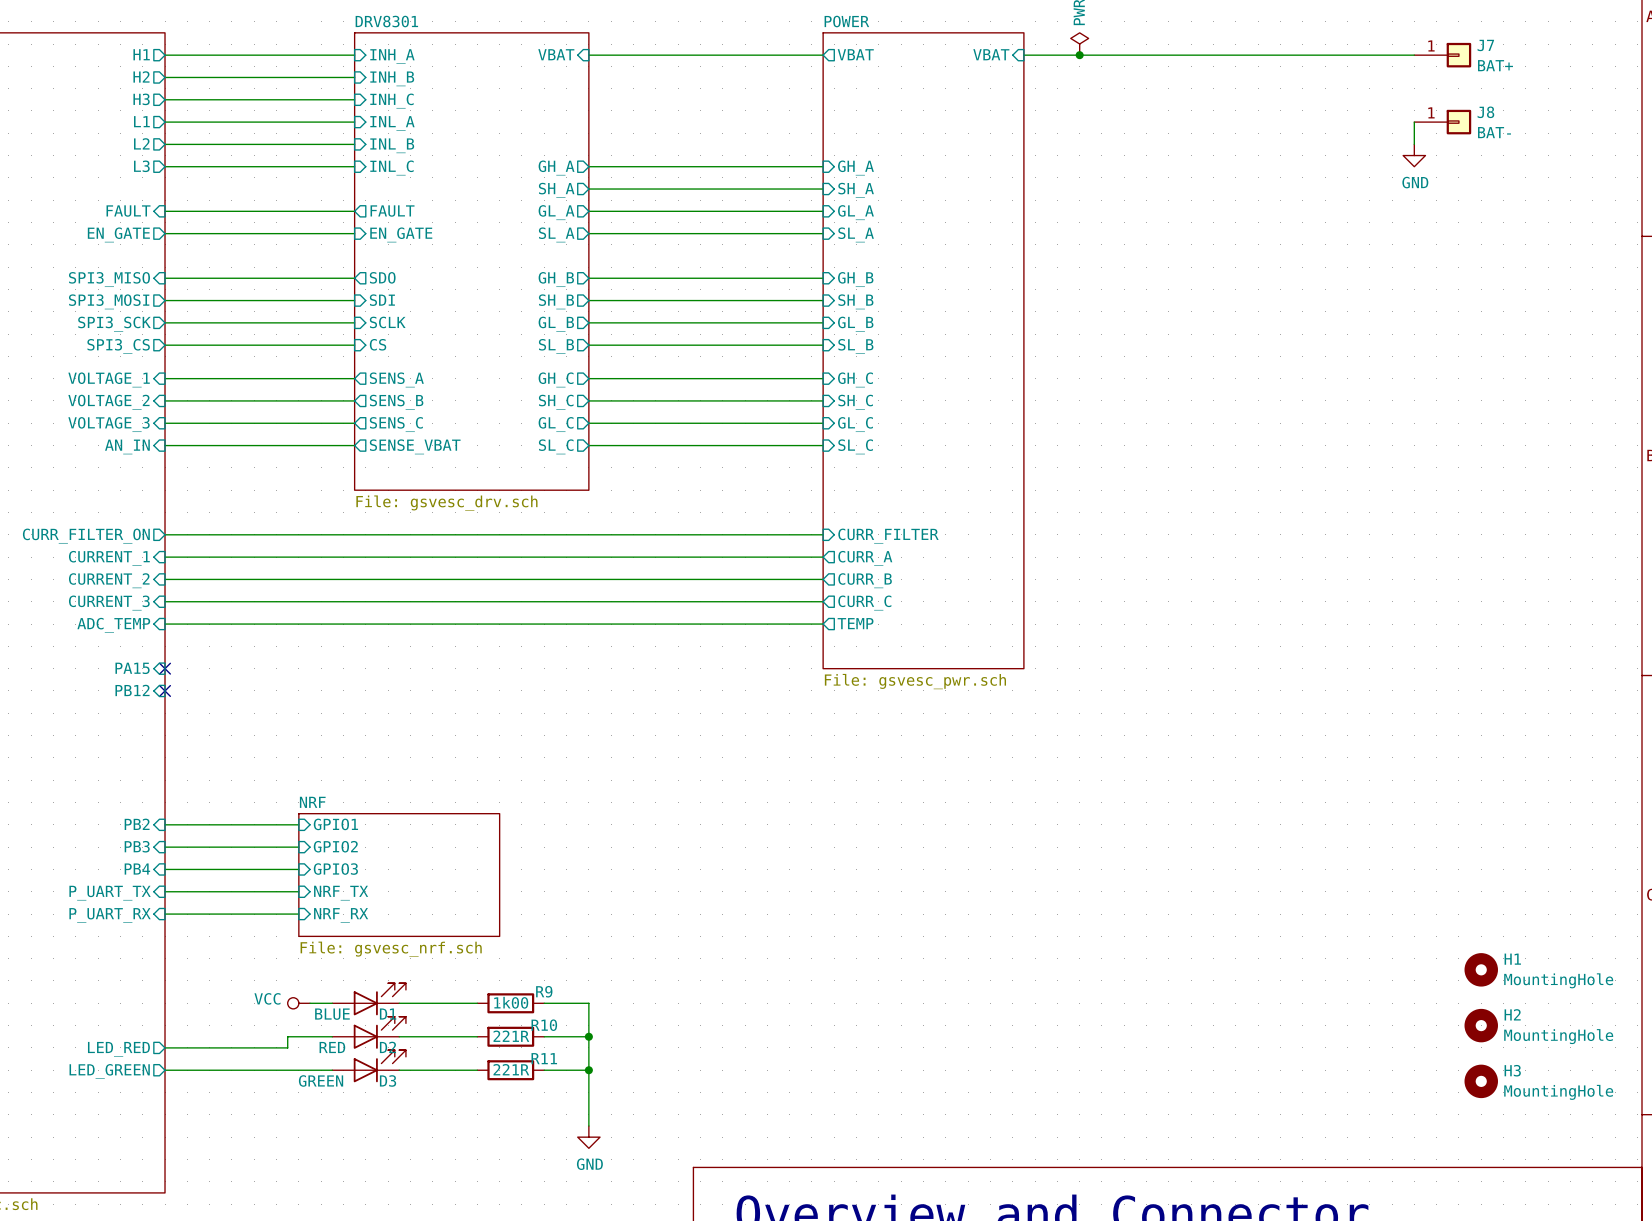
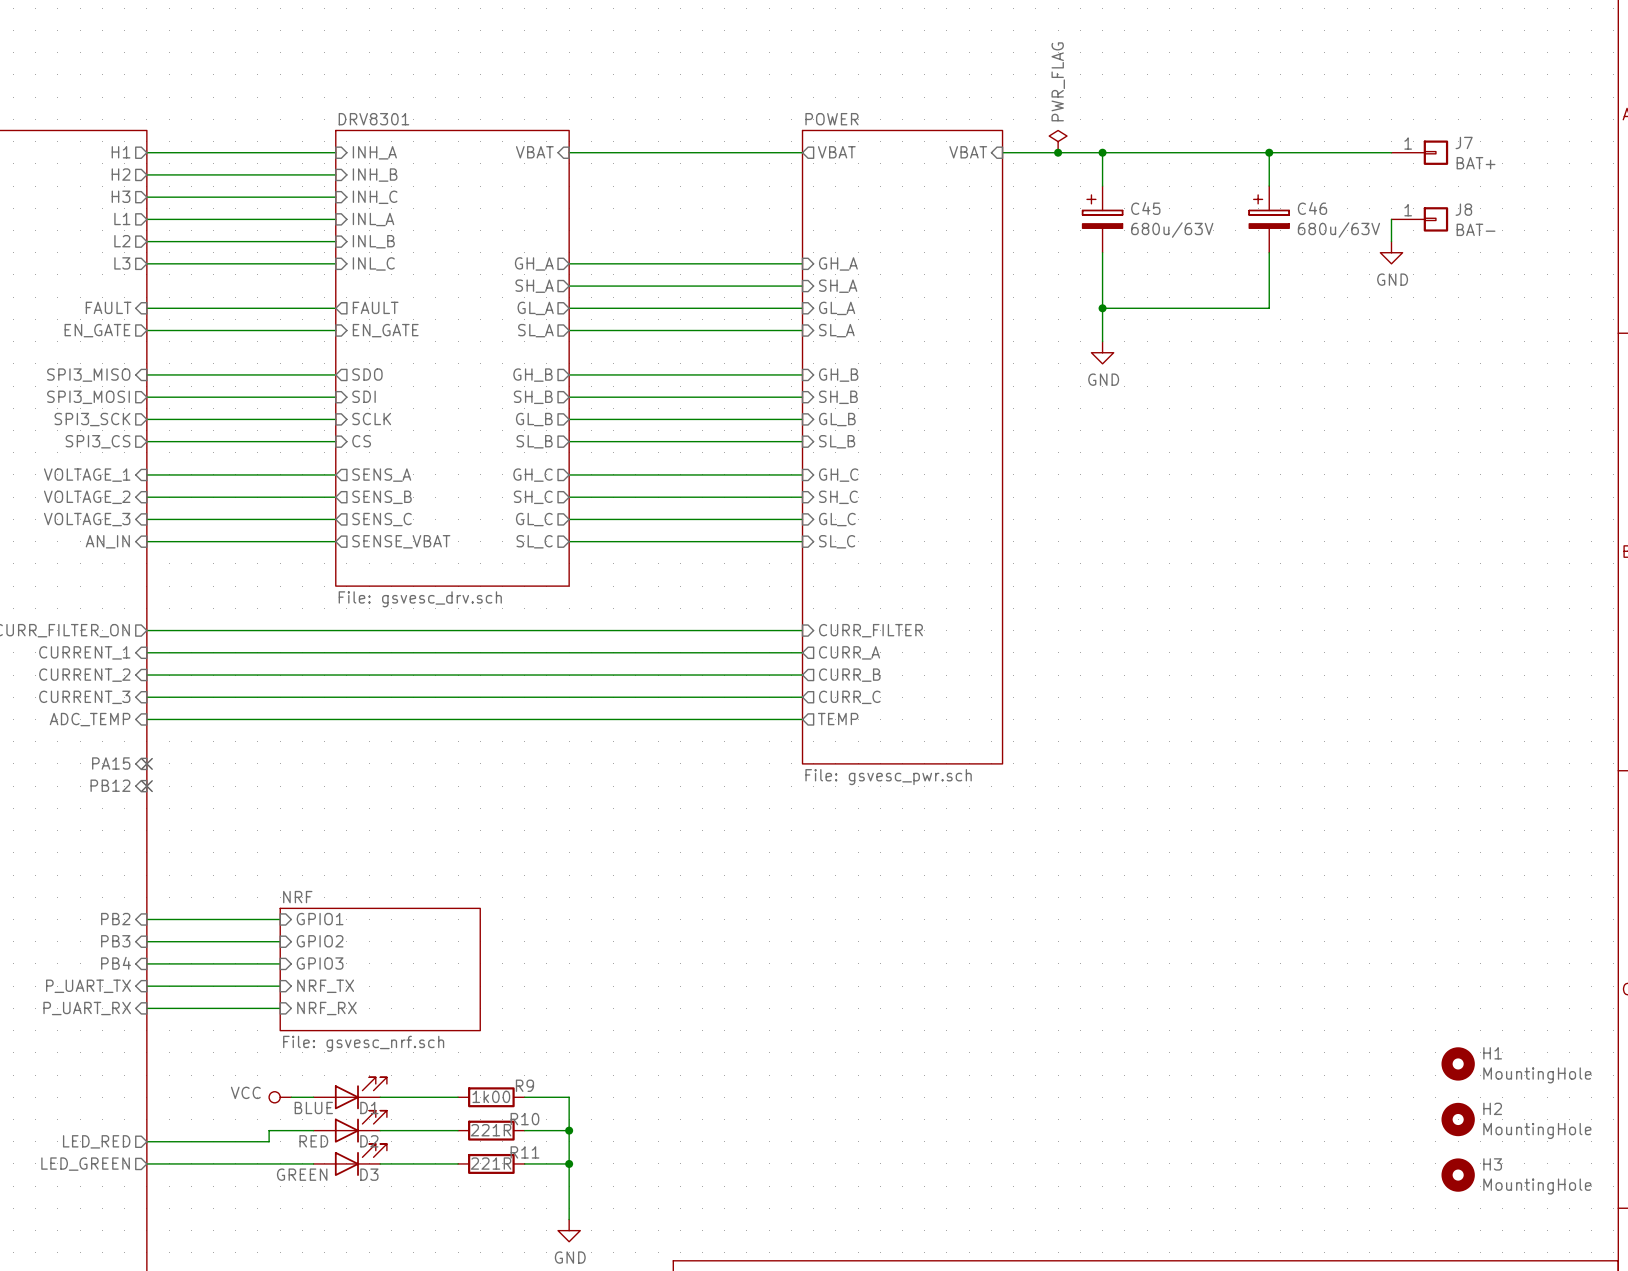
wire: none -> (1102, 152) (1102, 186)
junction: none -> (1102, 152)
wire: none -> (1269, 152) (1269, 186)
junction: none -> (1269, 152)
C45: none -> 680u/63V (1102, 219)
C46: none -> 680u/63V (1269, 219)
wire: none -> (1102, 252) (1102, 341)
wire: none -> (1269, 252) (1269, 308) (1102, 308)
junction: none -> (1102, 308)
power symbol: none -> GND (1102, 352)

